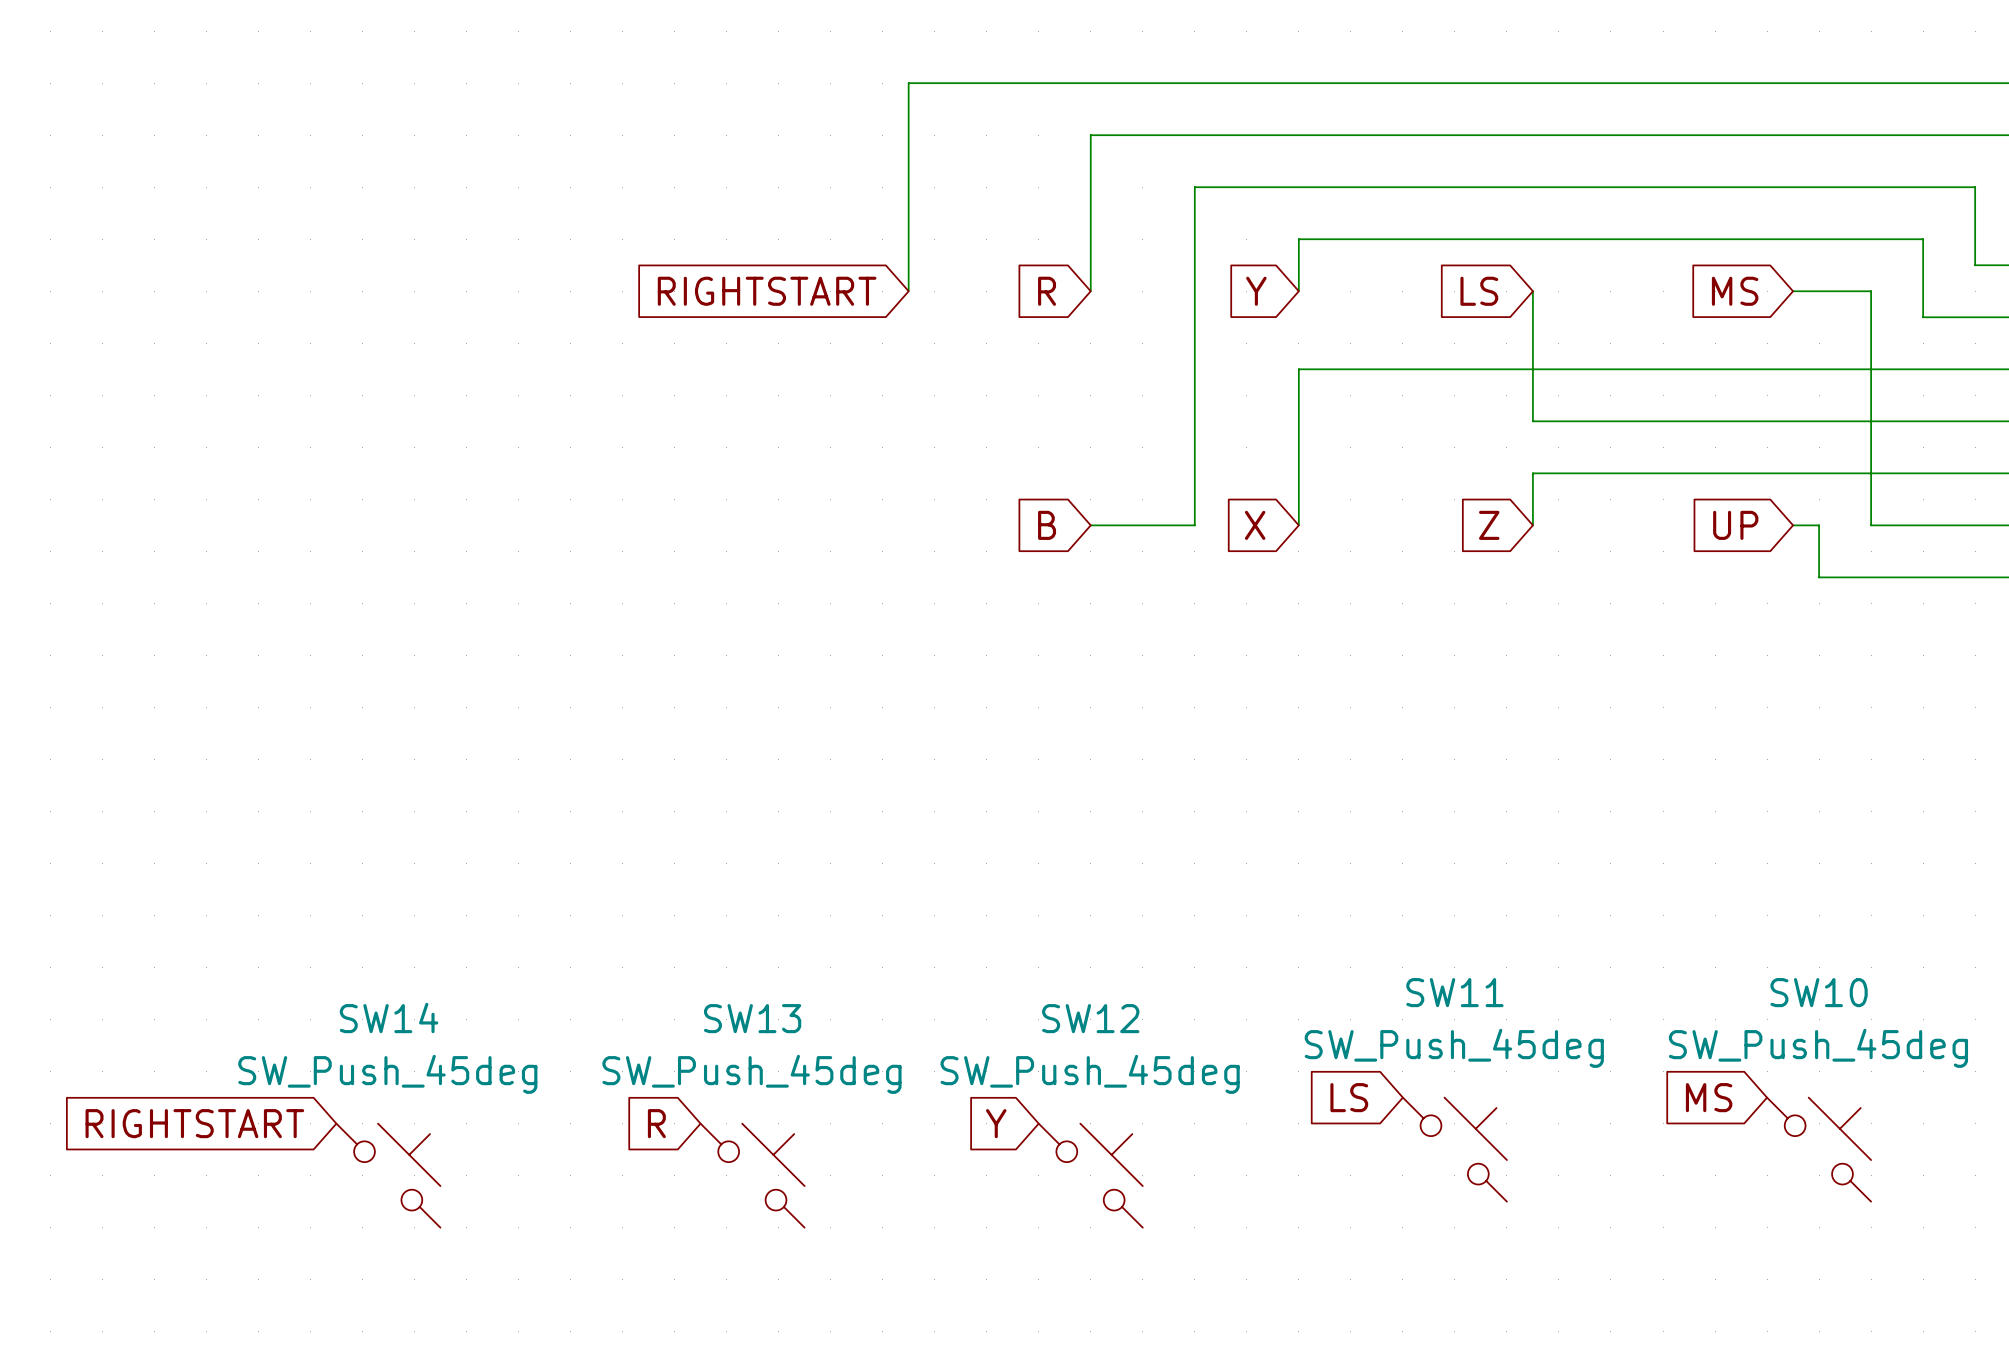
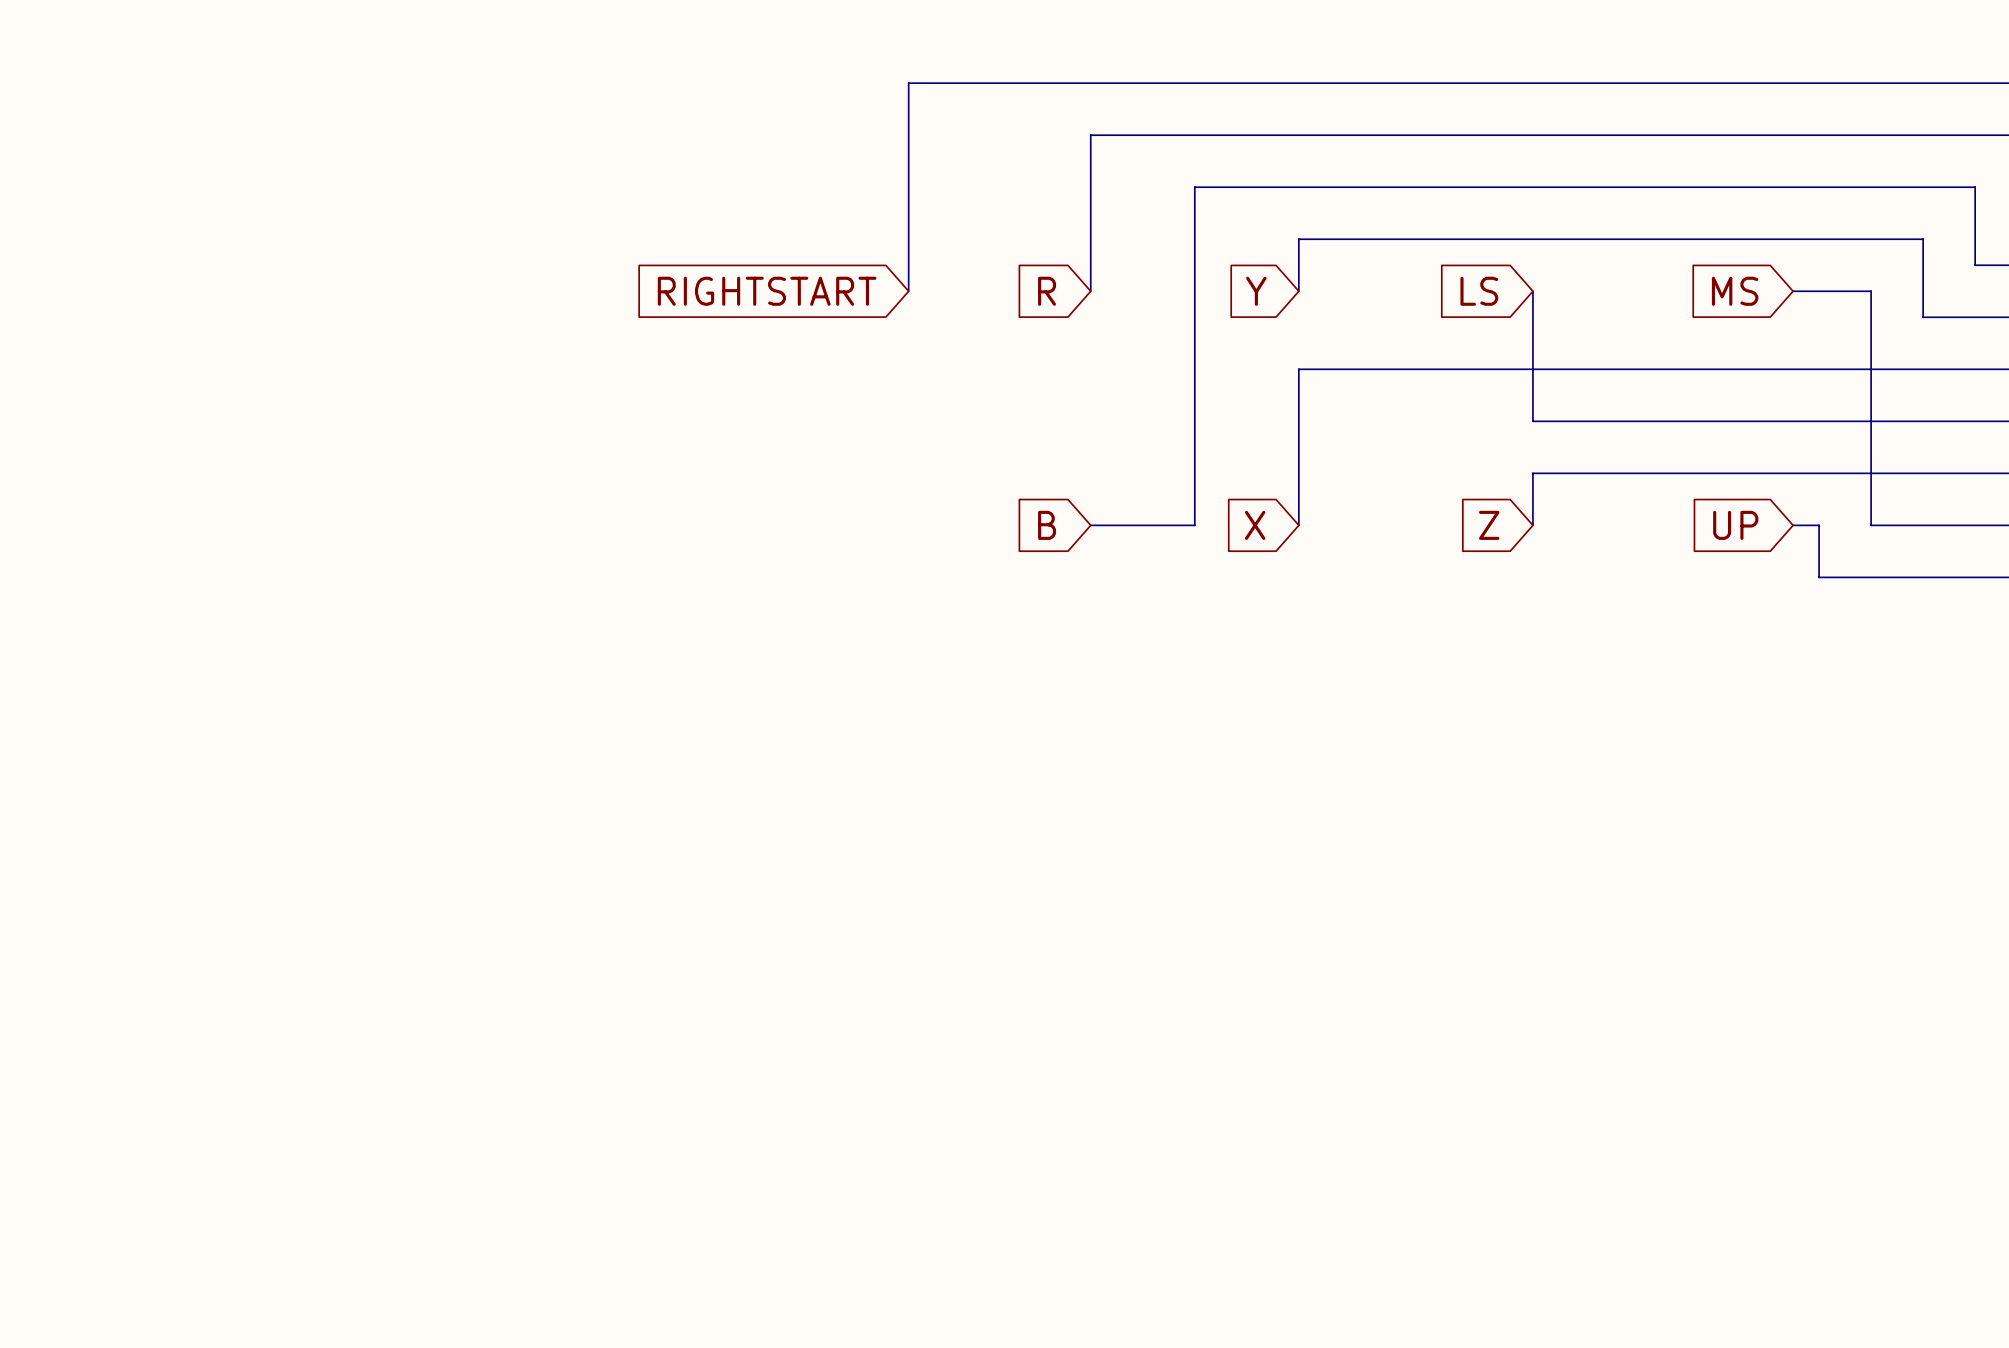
global label: LS (1349, 1097) -> none
global label: MS (1709, 1097) -> none
global label: RIGHTSTART (194, 1123) -> none
global label: R (656, 1123) -> none
global label: Y (996, 1123) -> none
SW11: SW_Push_45deg (1454, 1149) -> none
SW10: SW_Push_45deg (1819, 1149) -> none
SW14: SW_Push_45deg (388, 1175) -> none
SW13: SW_Push_45deg (752, 1175) -> none
SW12: SW_Push_45deg (1090, 1175) -> none

